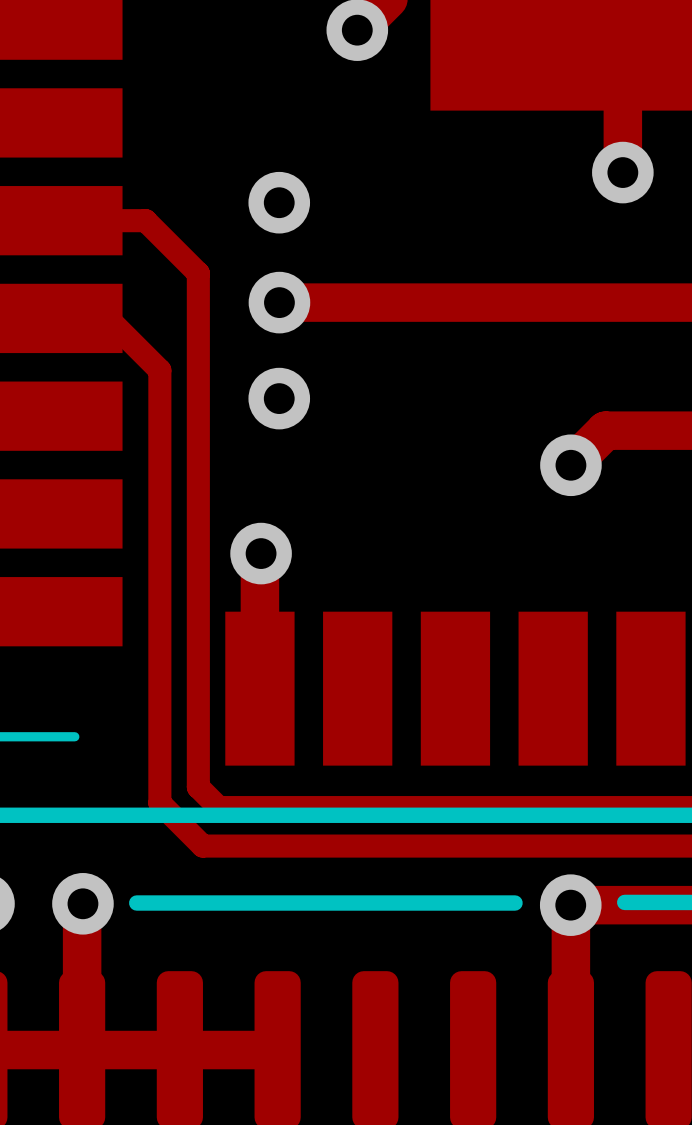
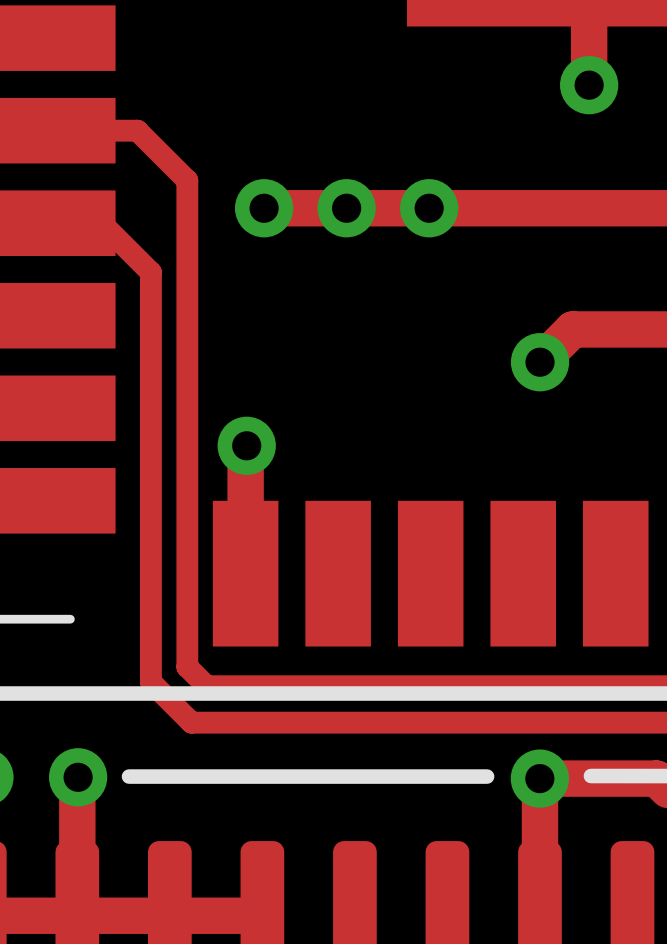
via: (279, 202) -> none
via: none -> (346, 208)
via: none -> (429, 208)
via: (279, 398) -> none

